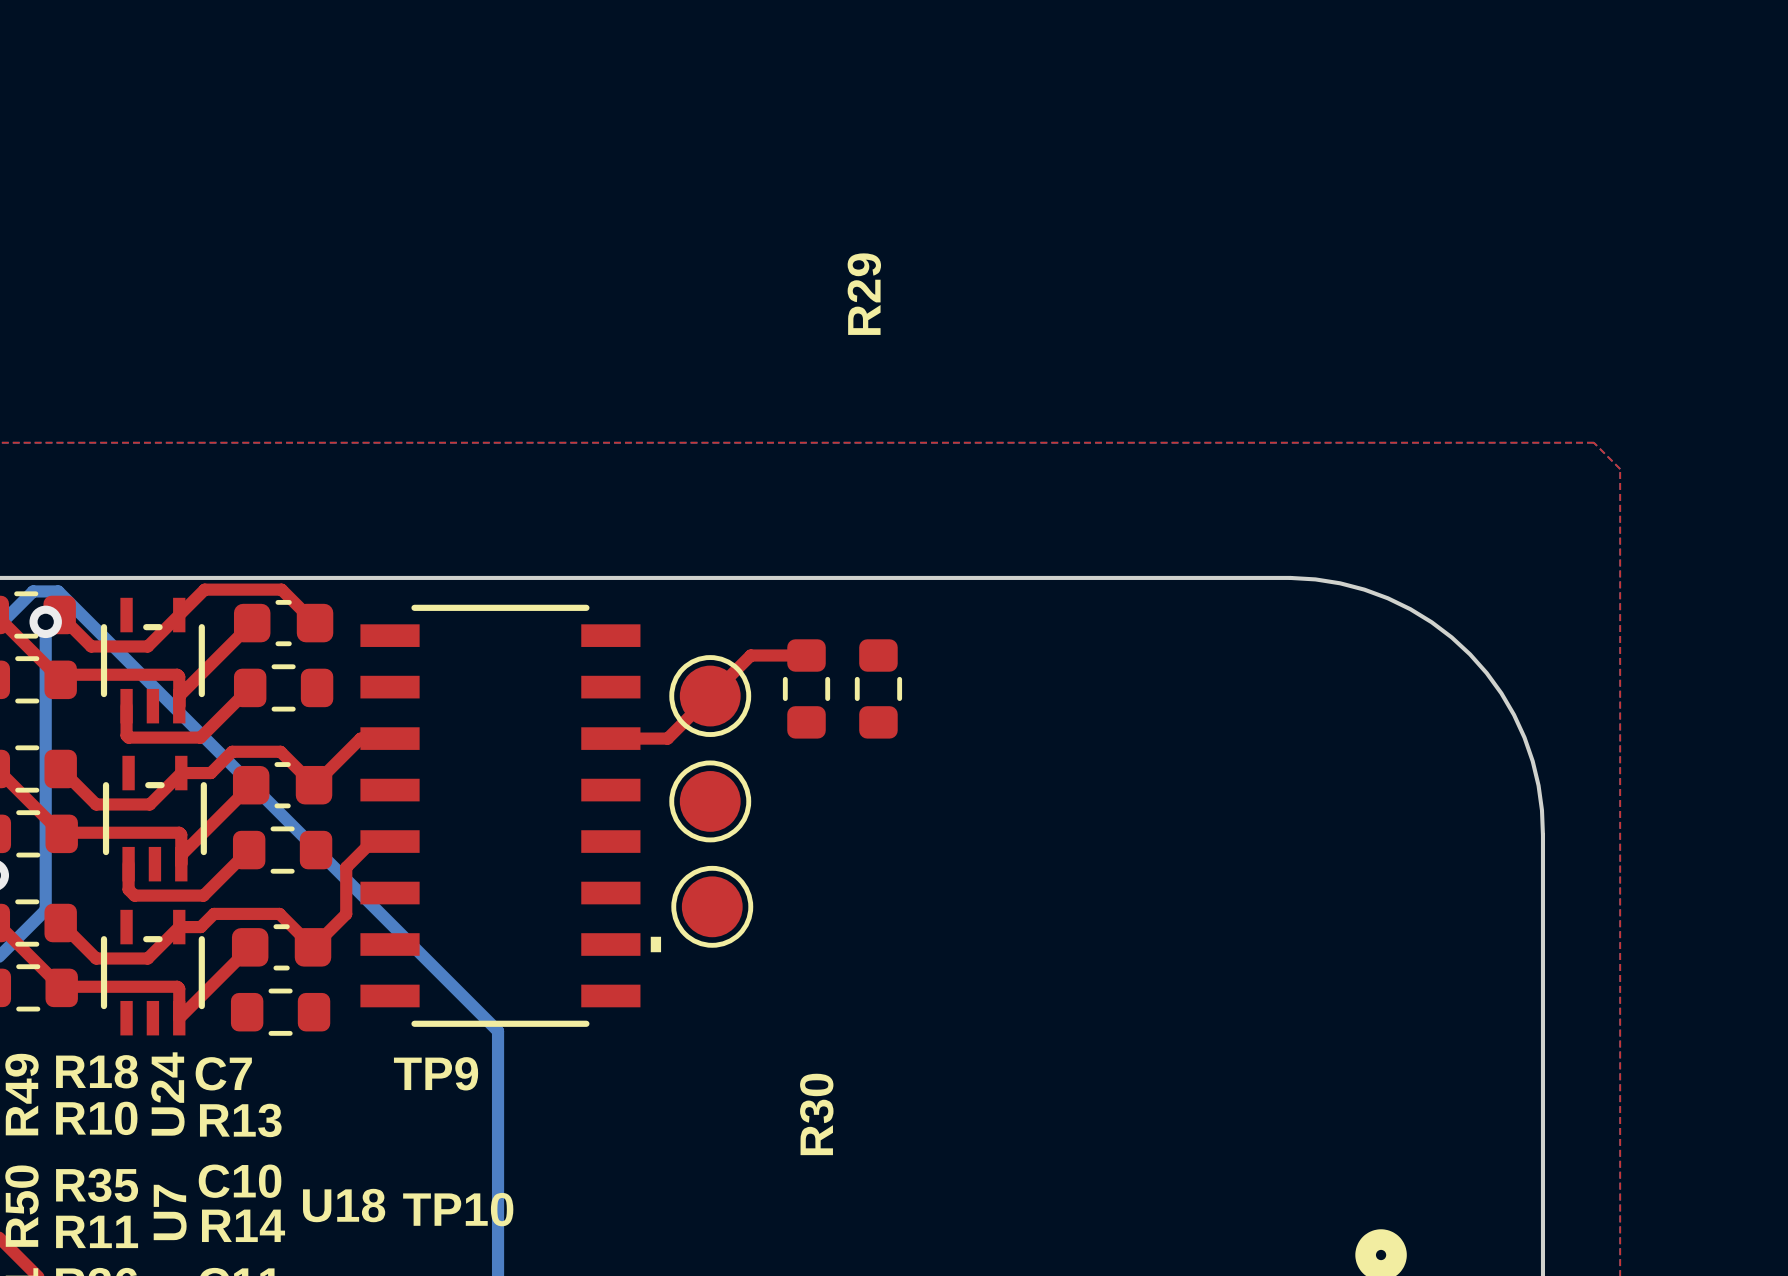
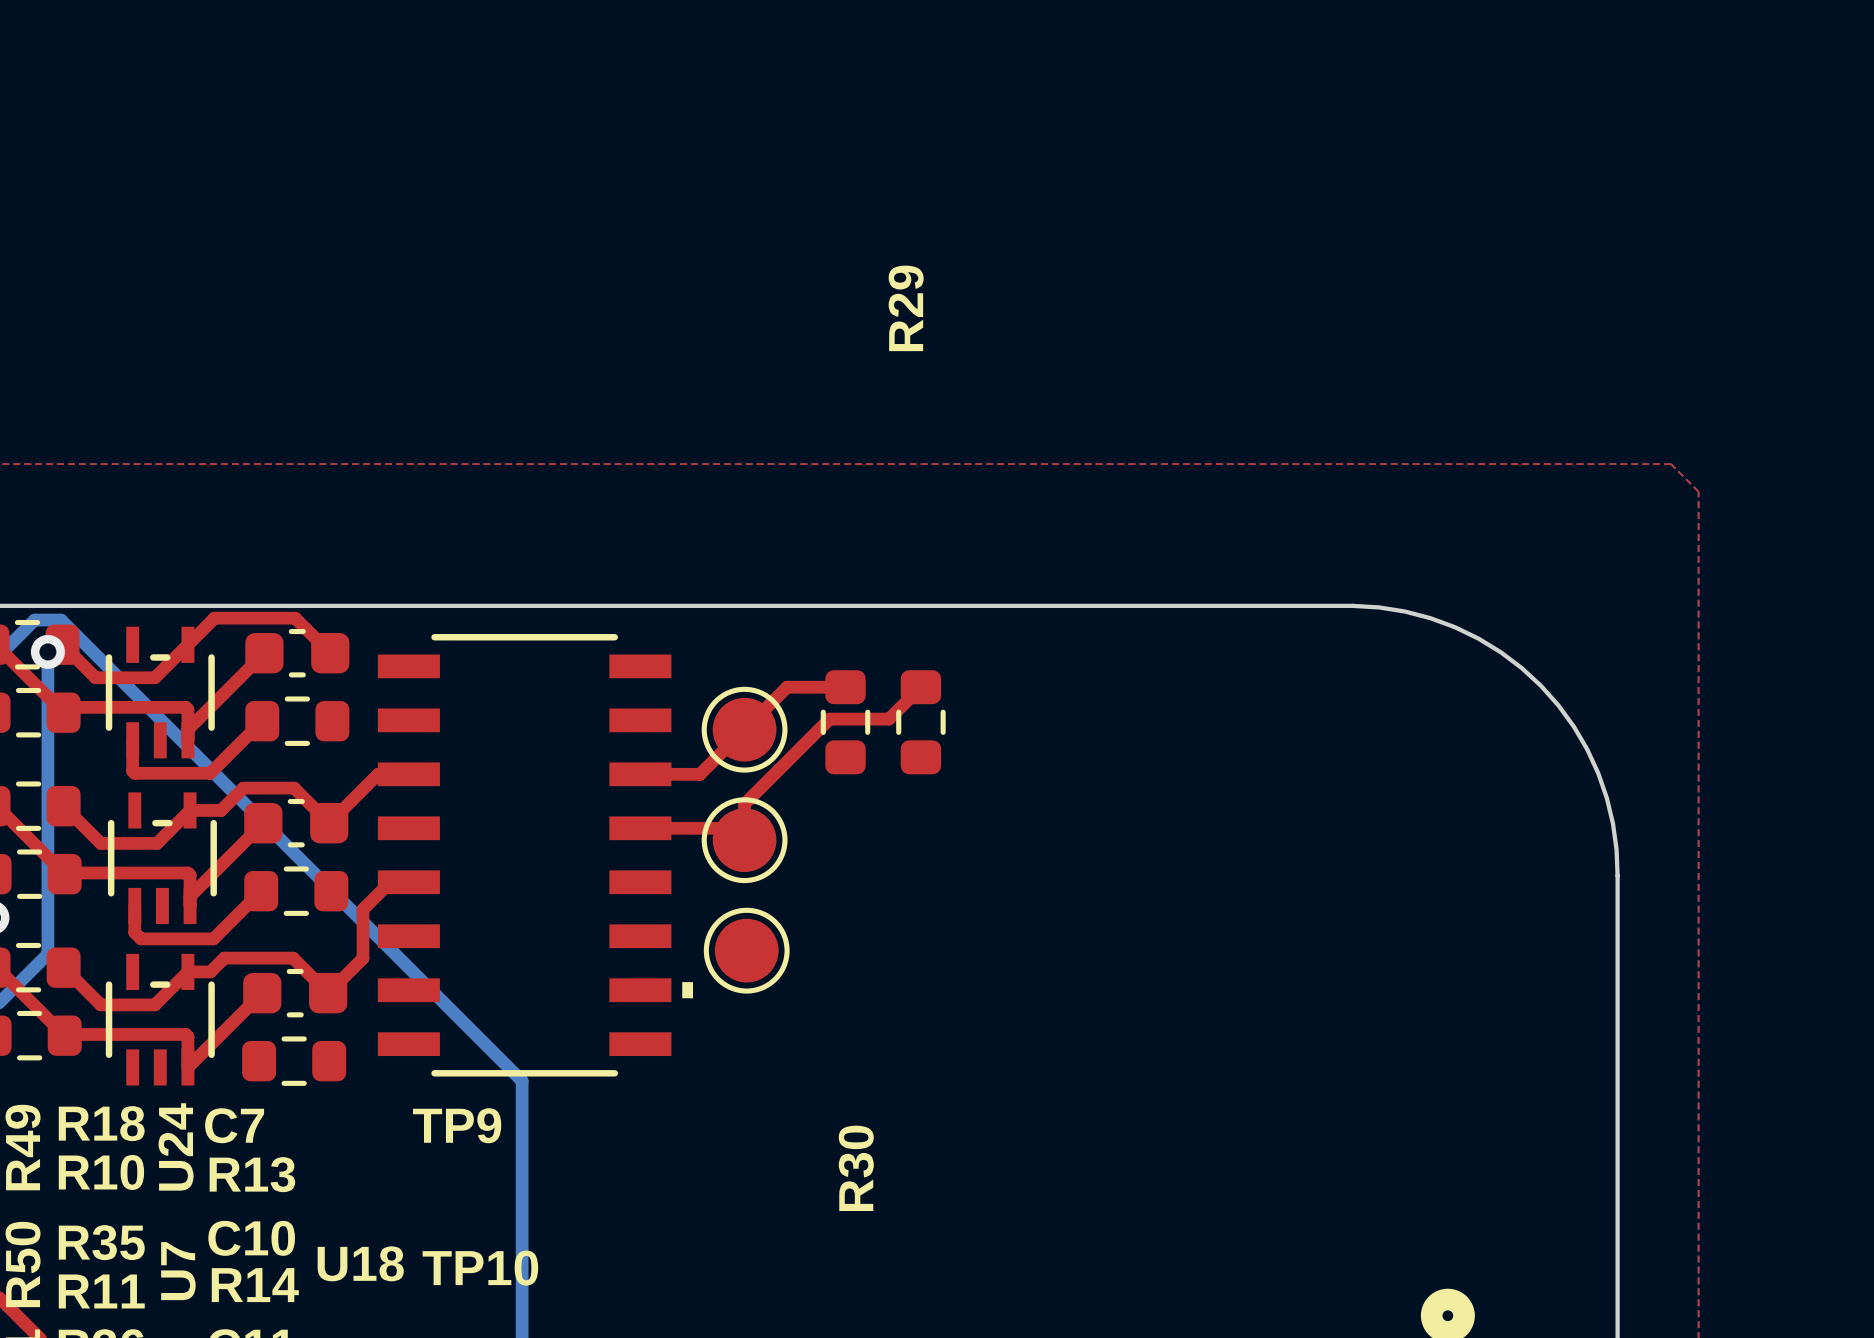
top track: none -> (920, 687) (889, 719) (829, 719) (744, 804) (744, 840) (732, 828) (640, 828)

